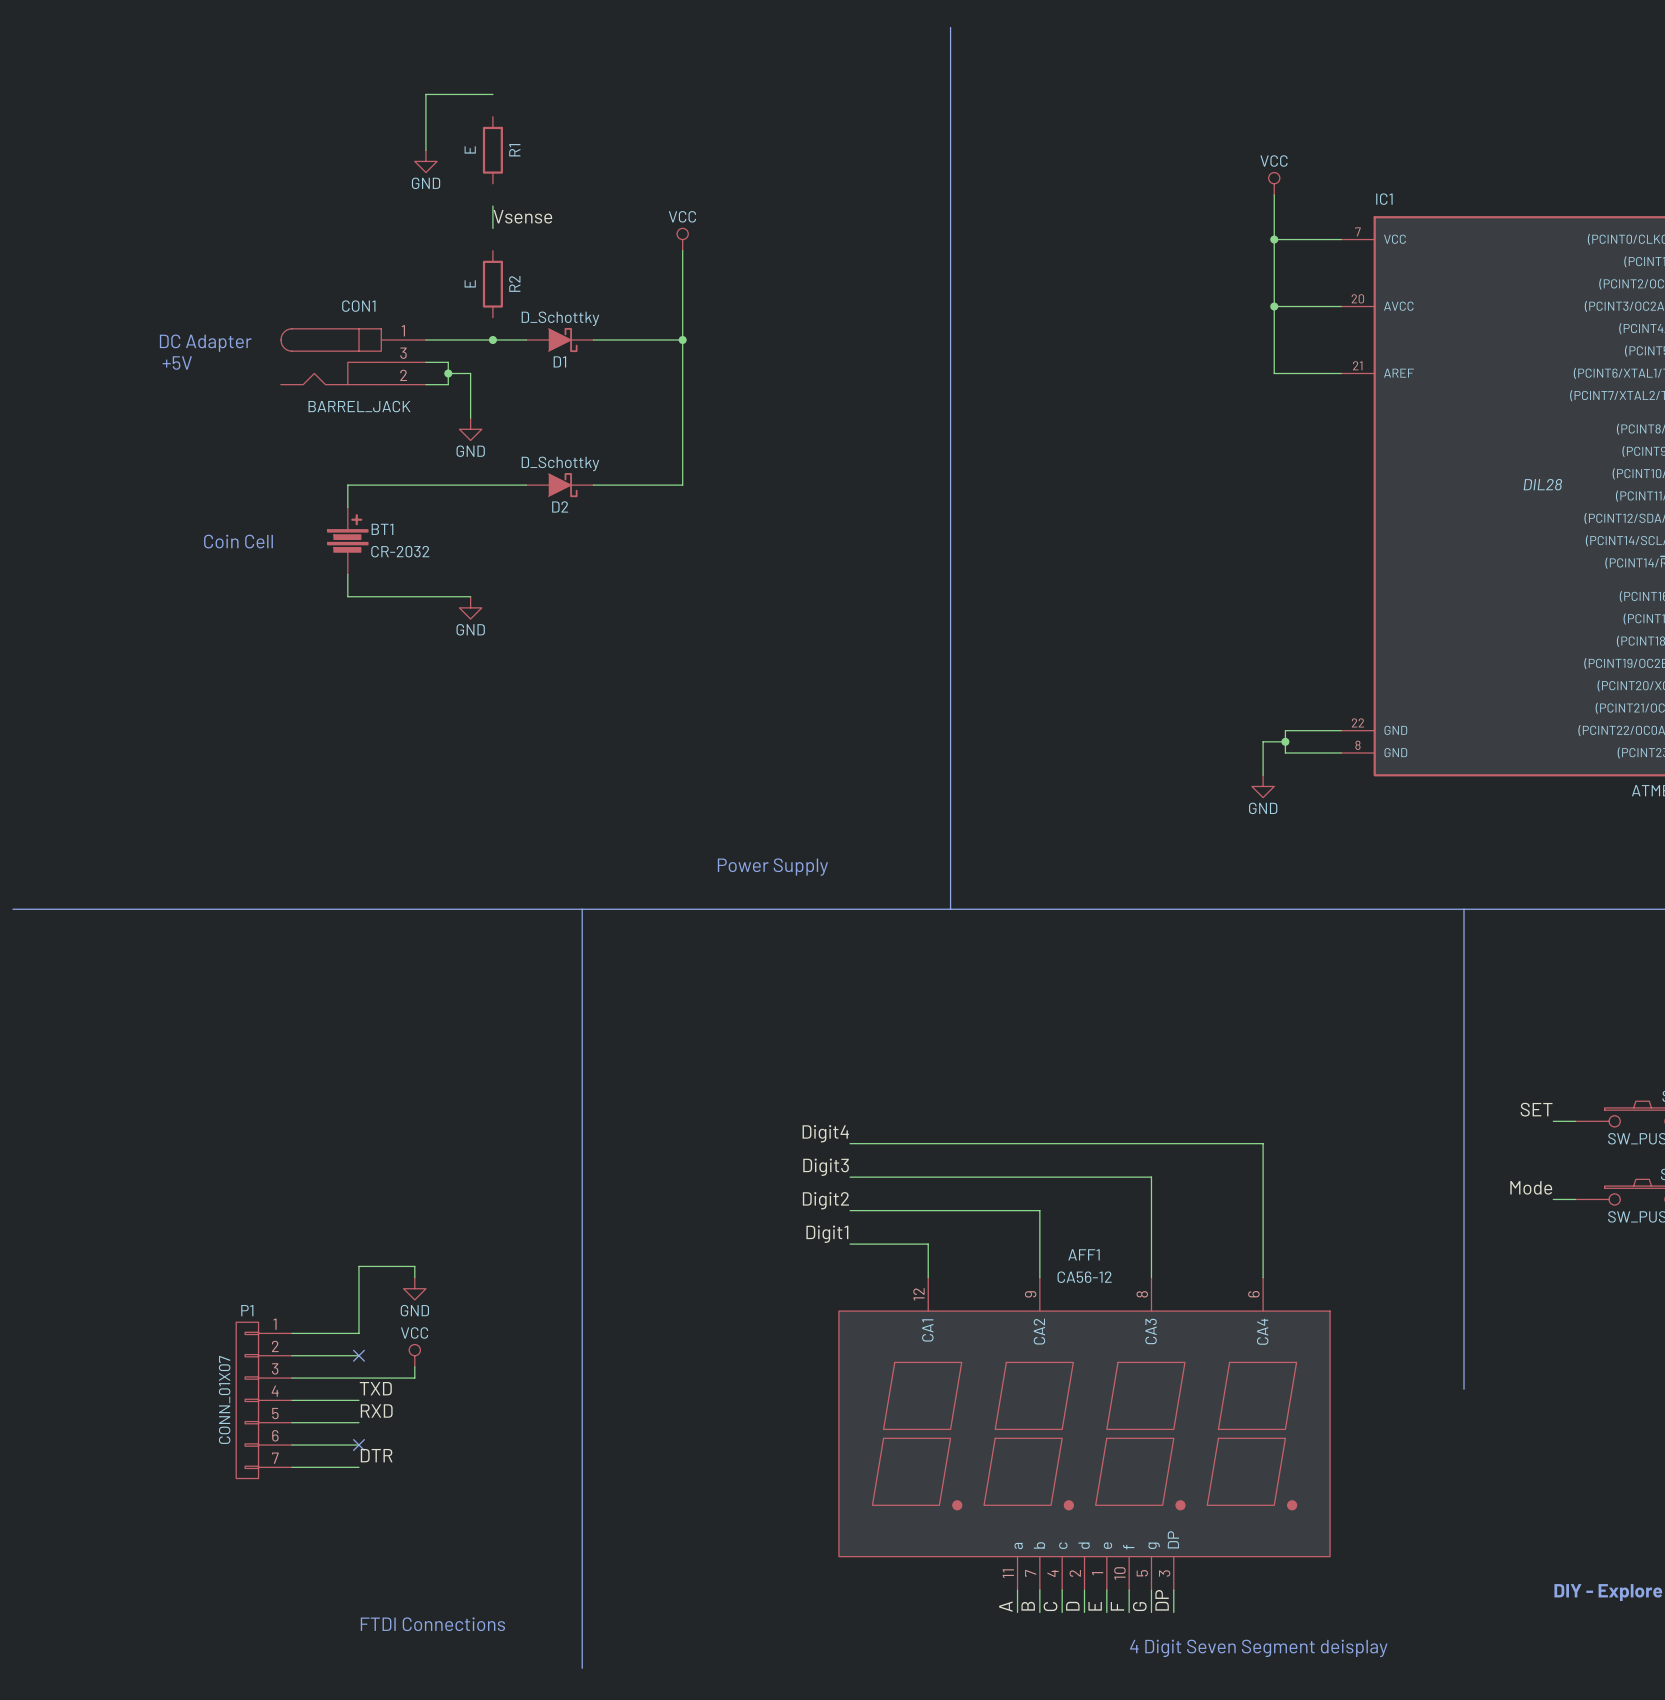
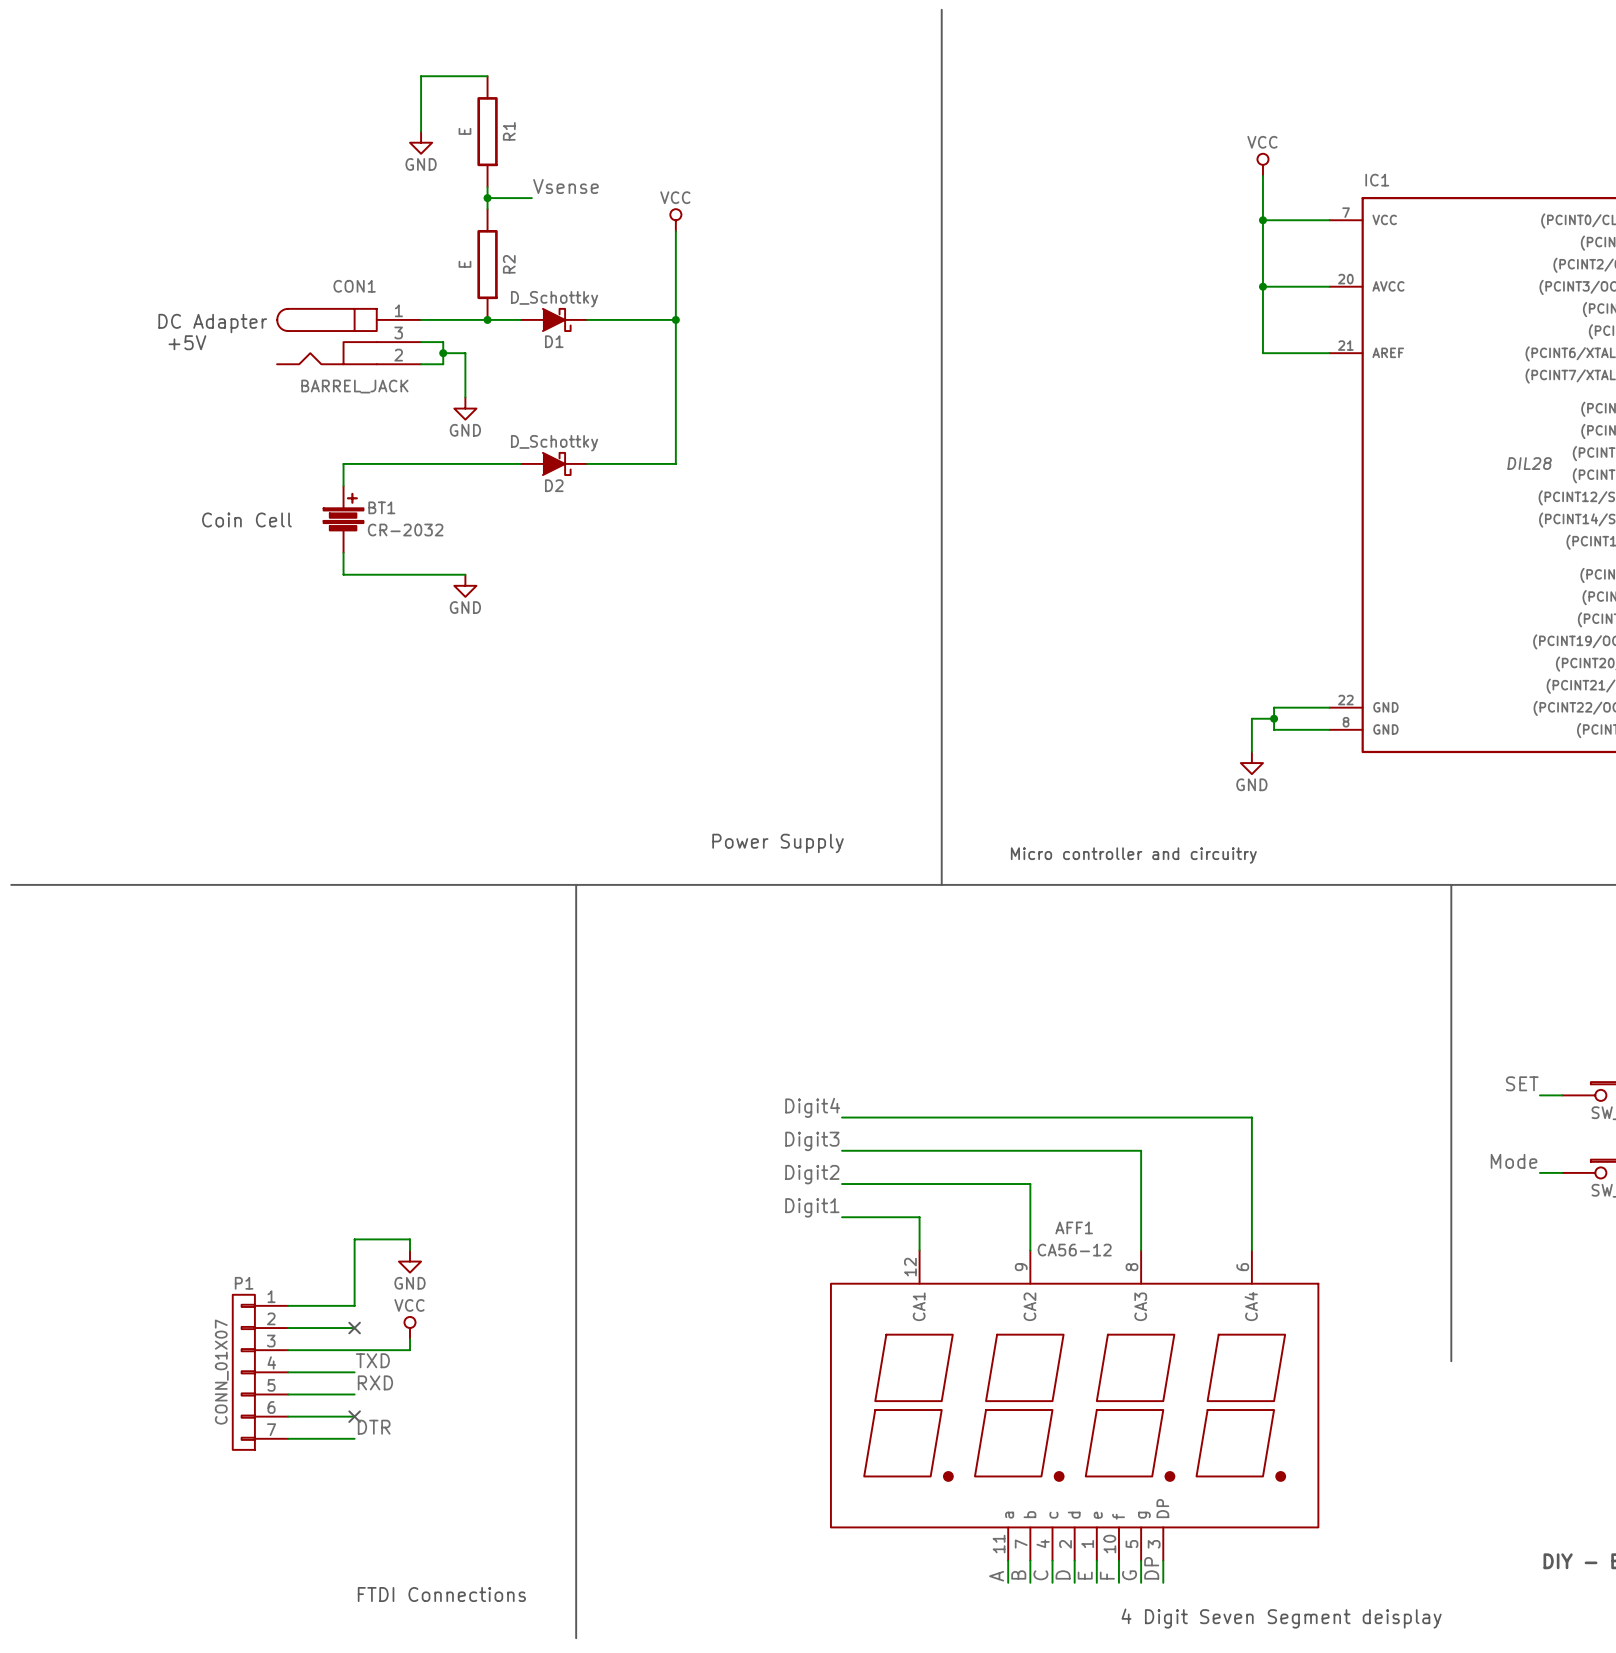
R1 symbol: [482, 116, 503, 184] -> [477, 76, 498, 188]
label position: Vsense (522, 216) -> Vsense (565, 186)
wire: none -> (487, 198) (531, 198)
junction: none -> (487, 198)
R2 symbol: [482, 250, 503, 318] -> [477, 209, 498, 320]
text: none -> Micro controller and circuitry (1133, 855)

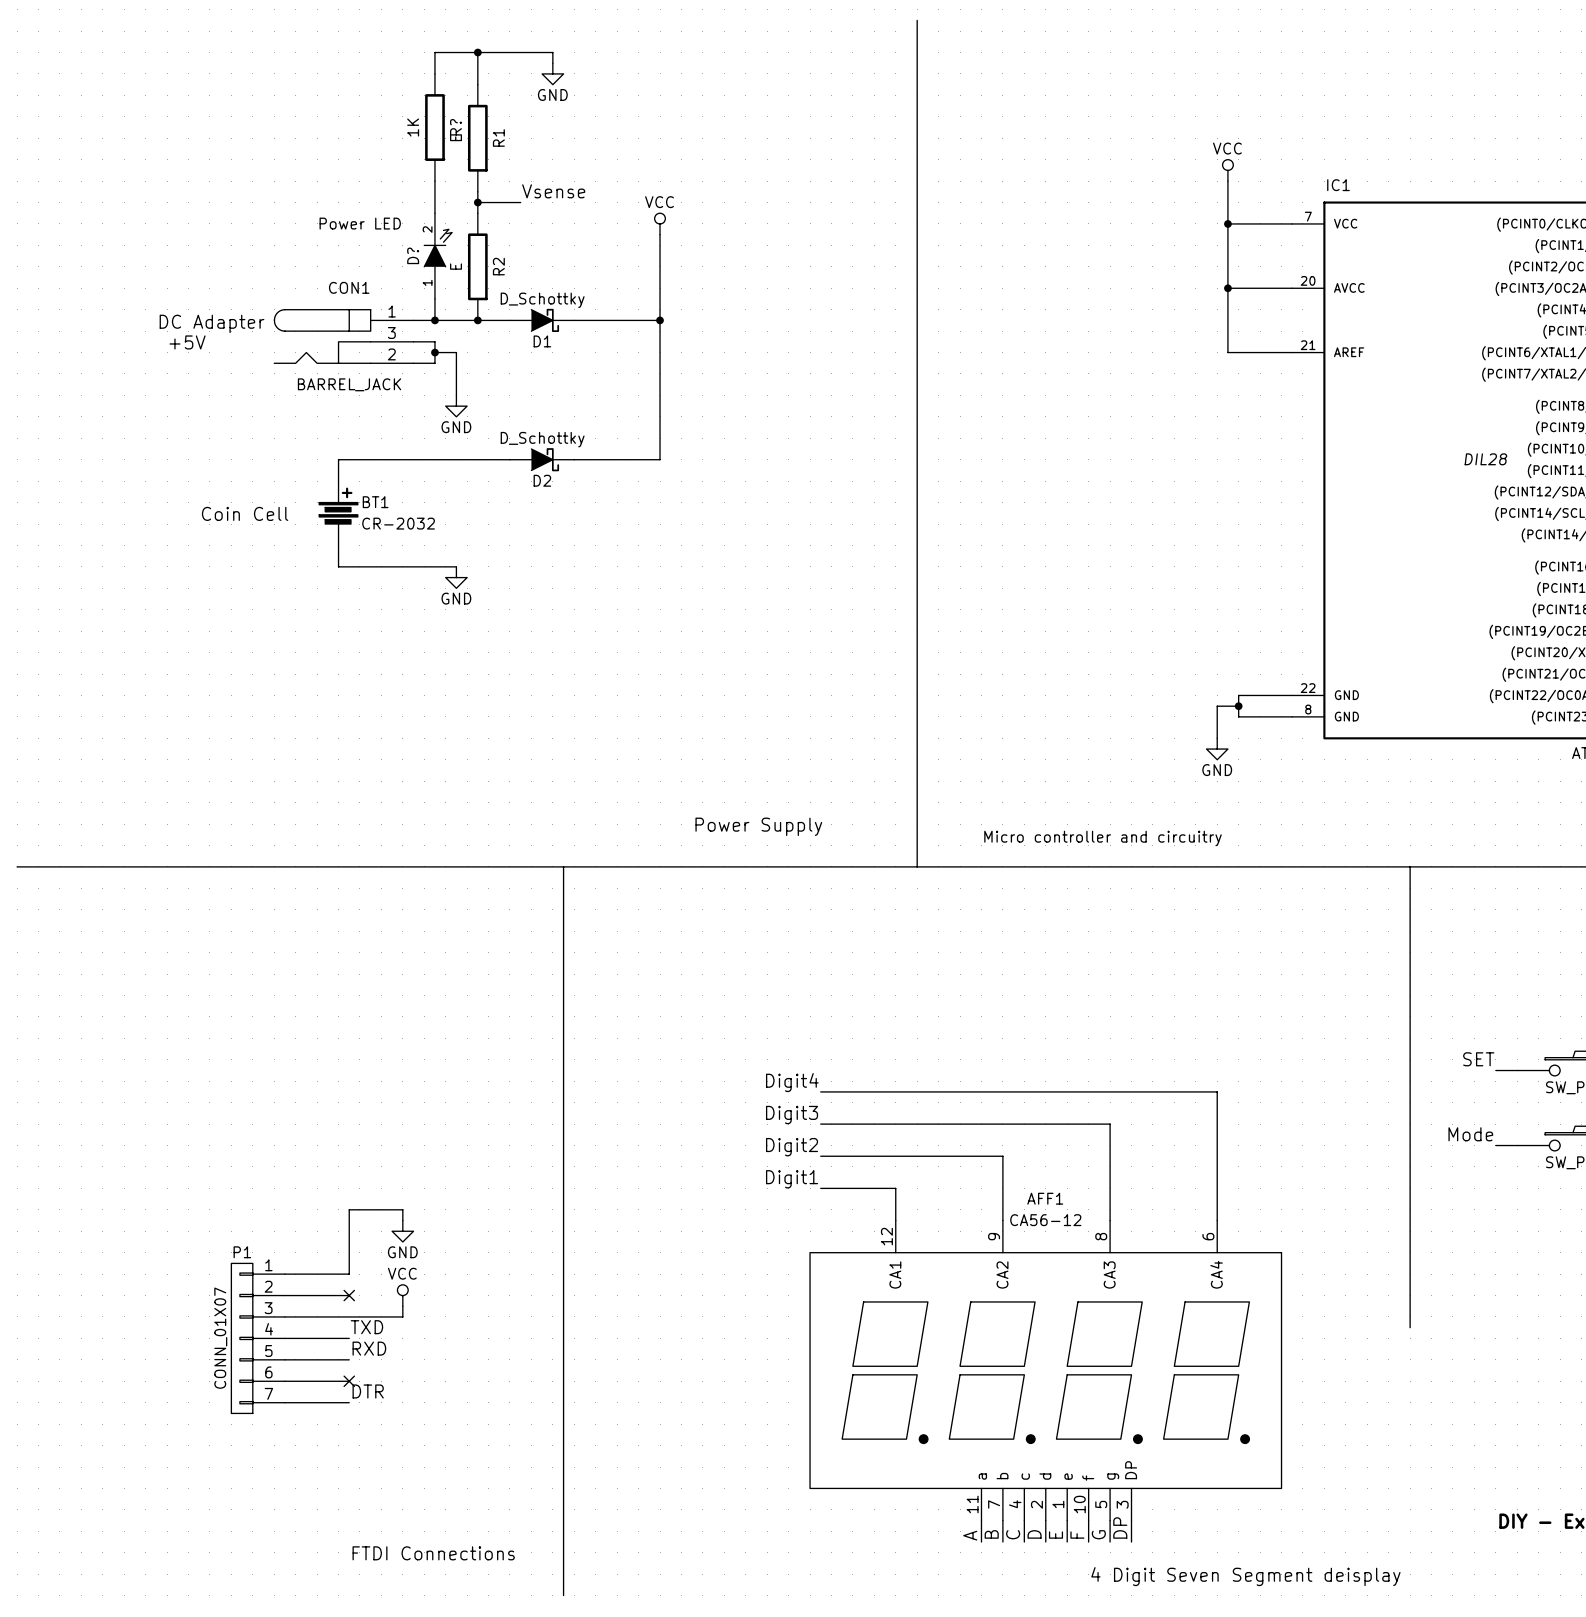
junction: none -> (477, 52)
wire: none -> (552, 63) (552, 52) (434, 52) (434, 73)
wire: (487, 76) (421, 76) (421, 131) -> (477, 84) (477, 52)
R?: none -> 1K (434, 127)
power symbol position: GND (421, 142) -> GND (552, 73)
wire: none -> (434, 181) (434, 213)
D?: none -> Power LED (438, 256)
wire: none -> (434, 298) (434, 320)
junction: none -> (434, 320)

